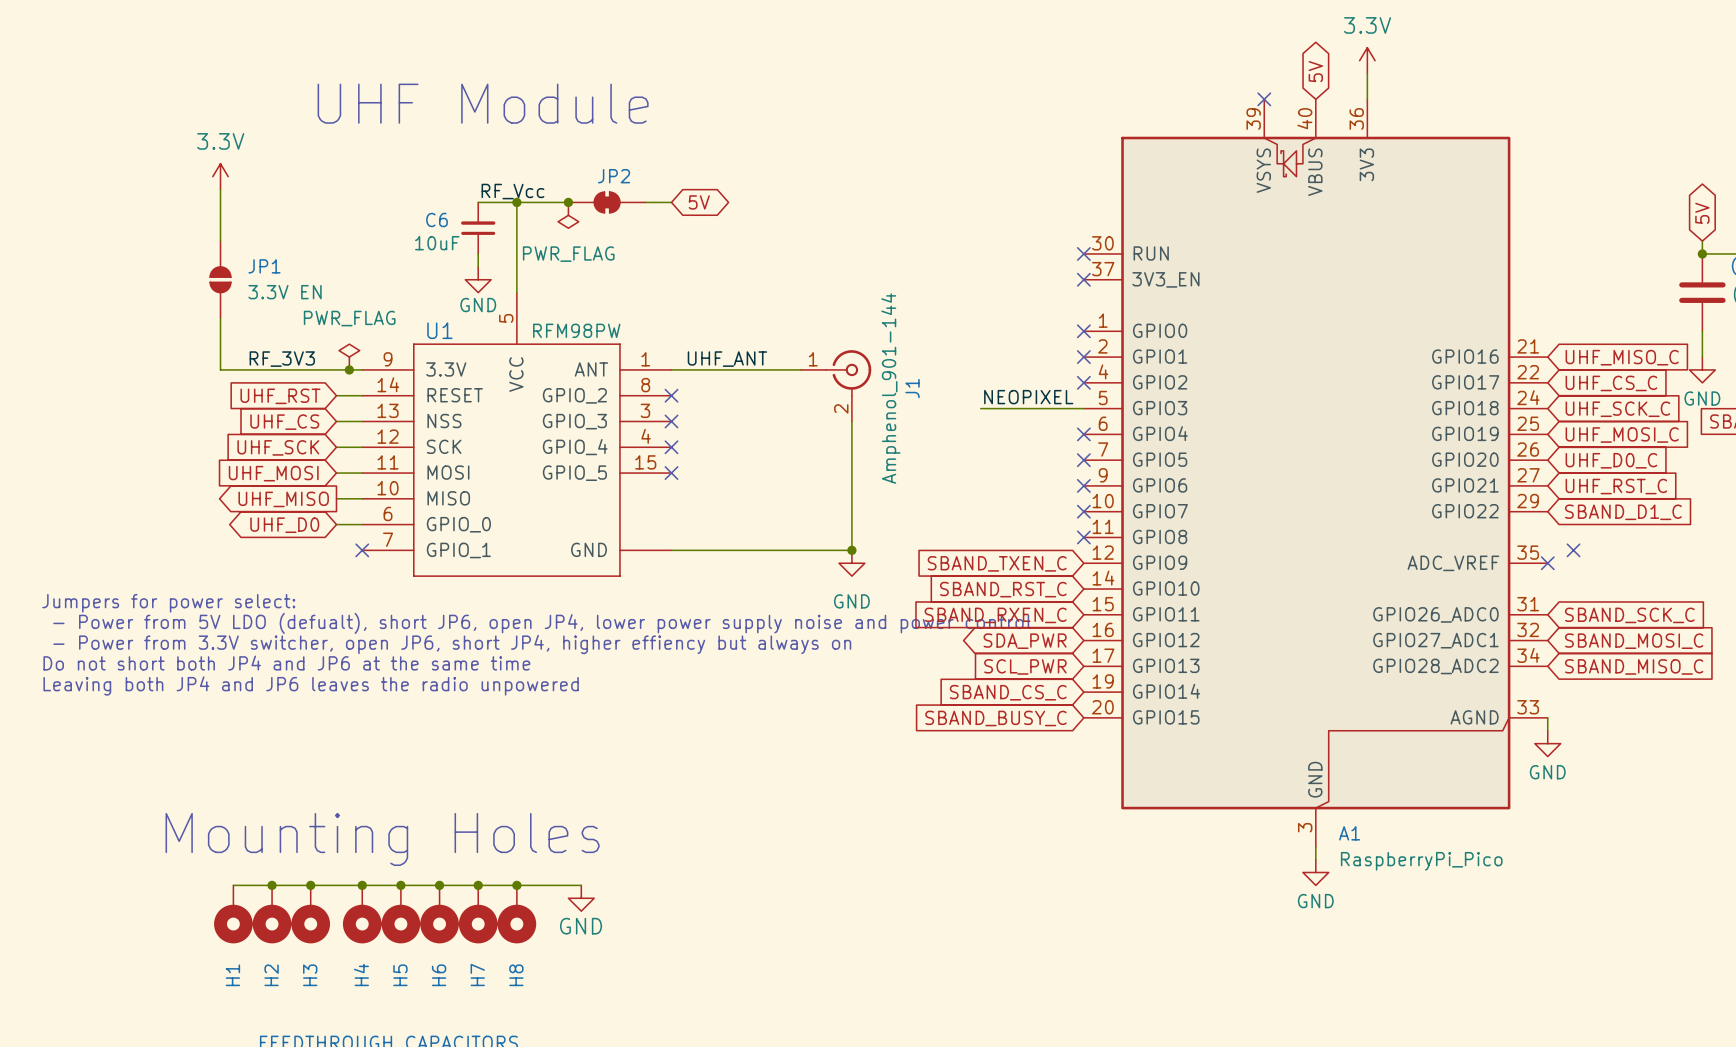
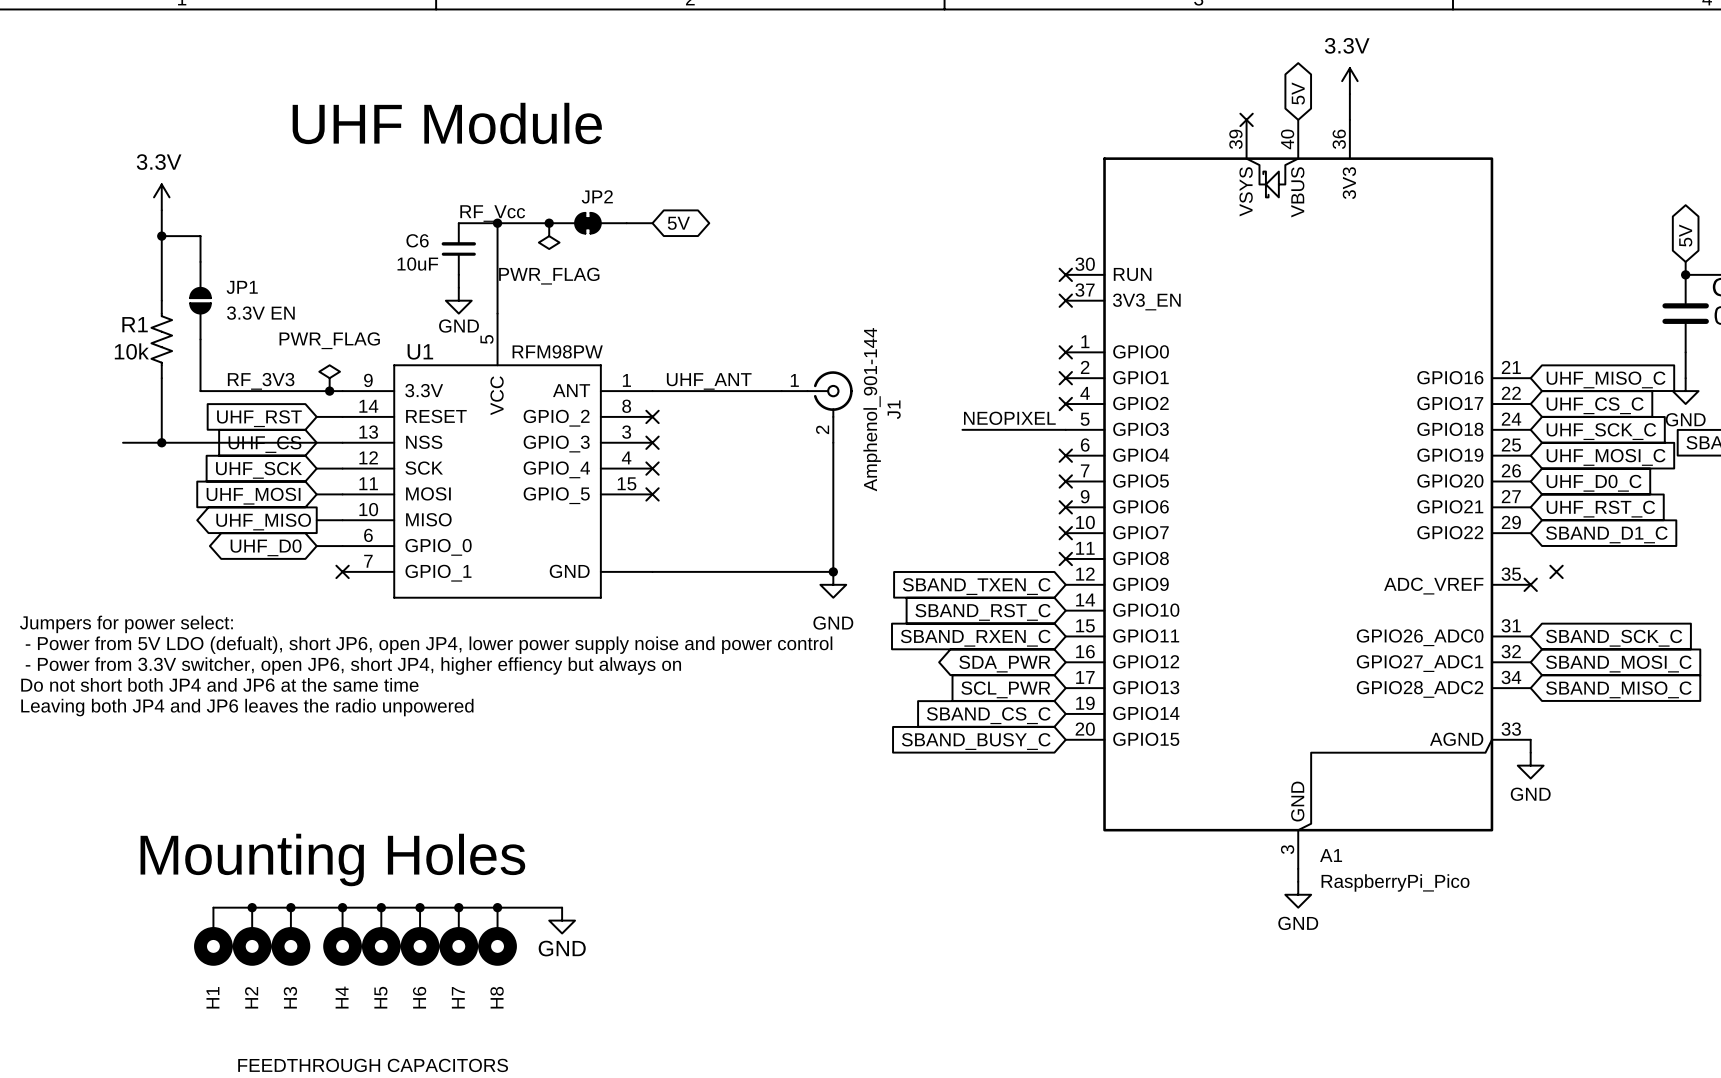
power symbol position: 3.3V (220, 176) -> 3.3V (161, 197)
wire: none -> (161, 210) (161, 300)
wire: (220, 189) (220, 215) -> (161, 236) (200, 236)
junction: none -> (161, 236)
R1: none -> 10k (161, 339)
wire: none -> (161, 378) (161, 442)
wire: none -> (123, 442) (316, 442)
junction: none -> (161, 442)

